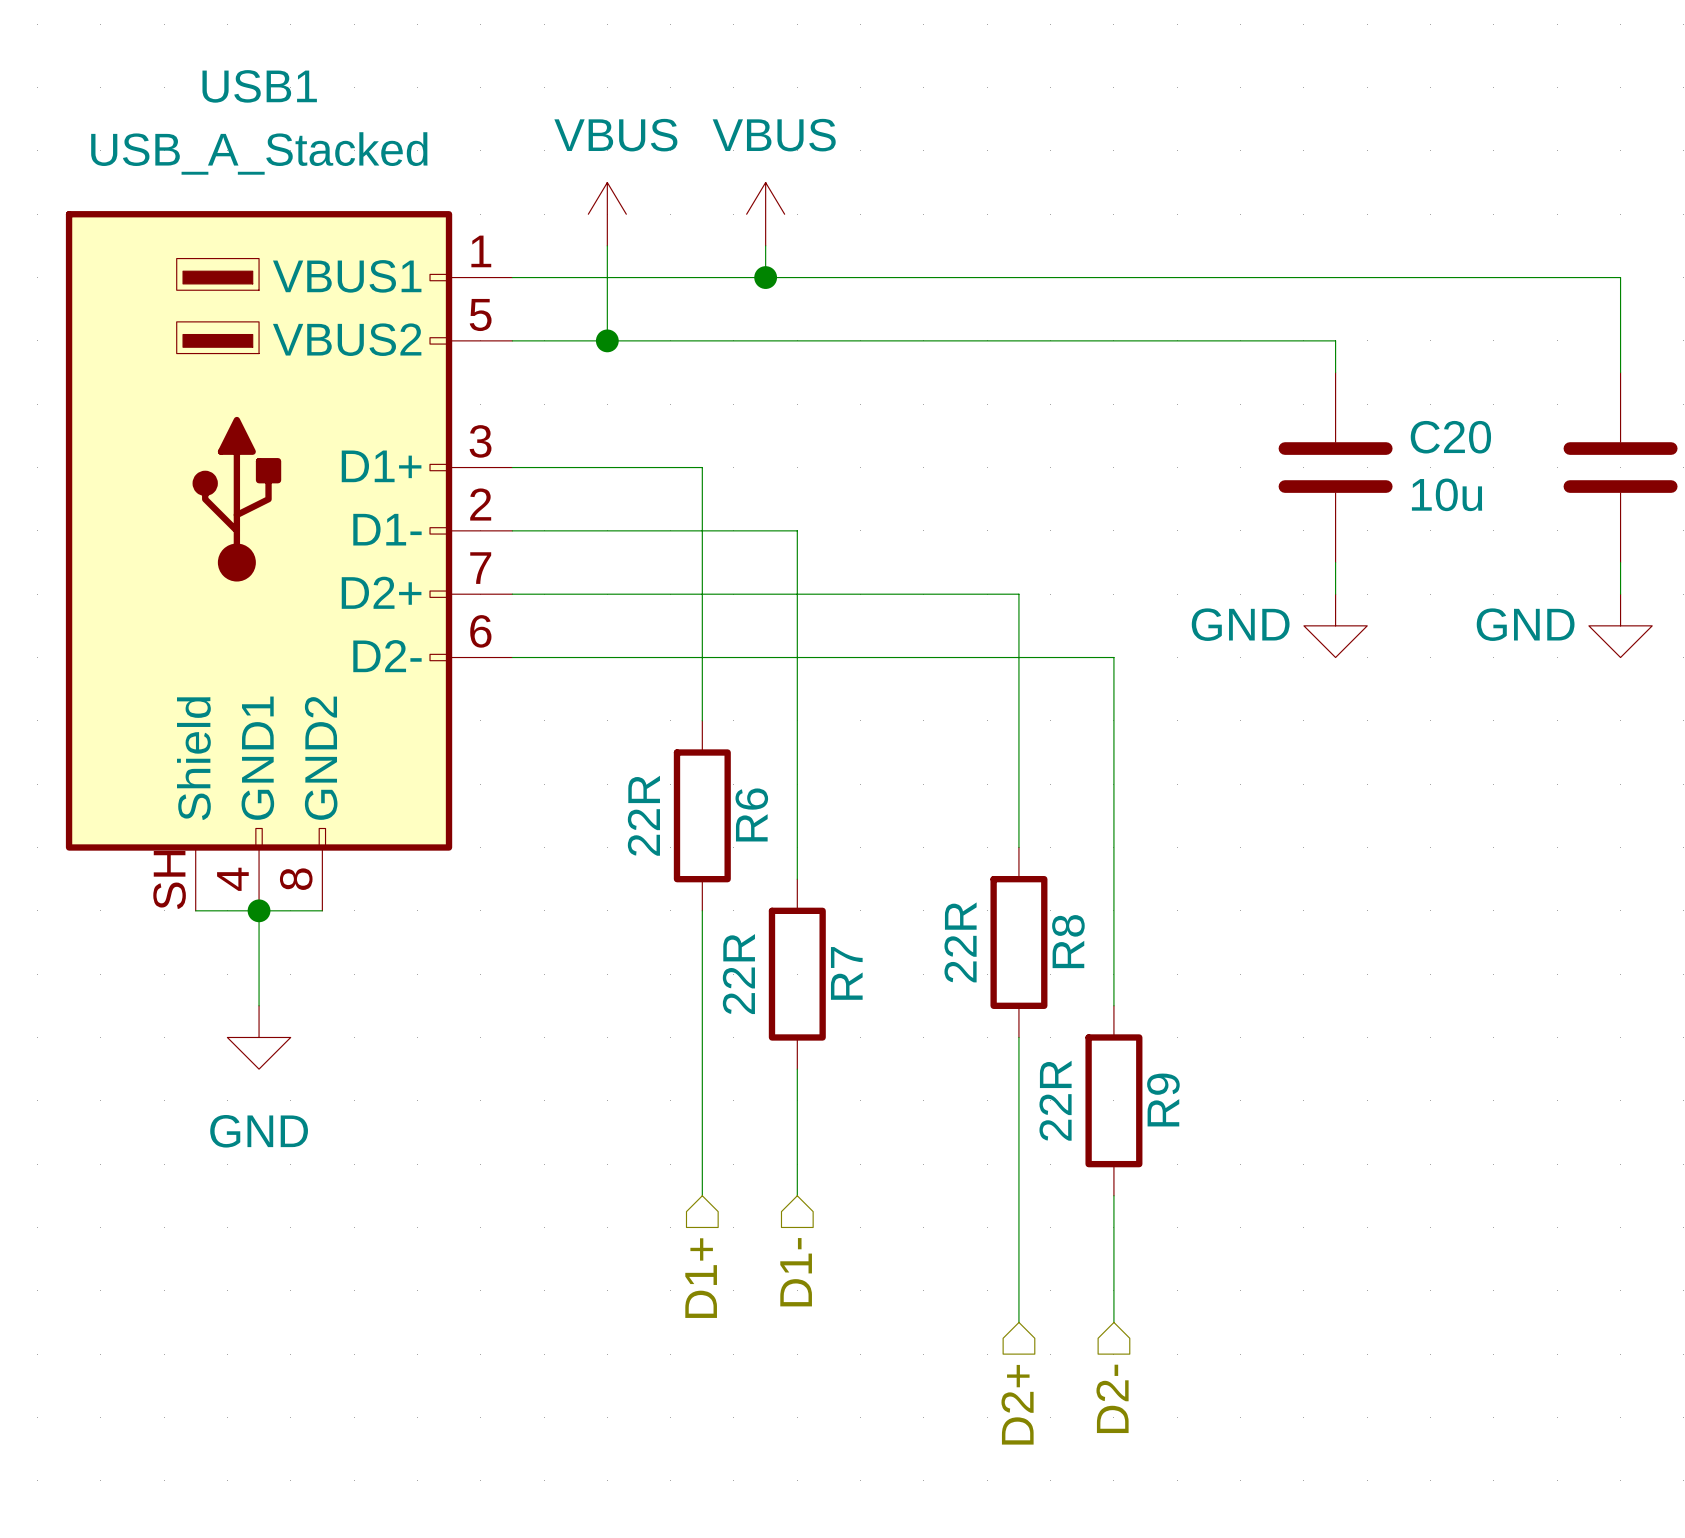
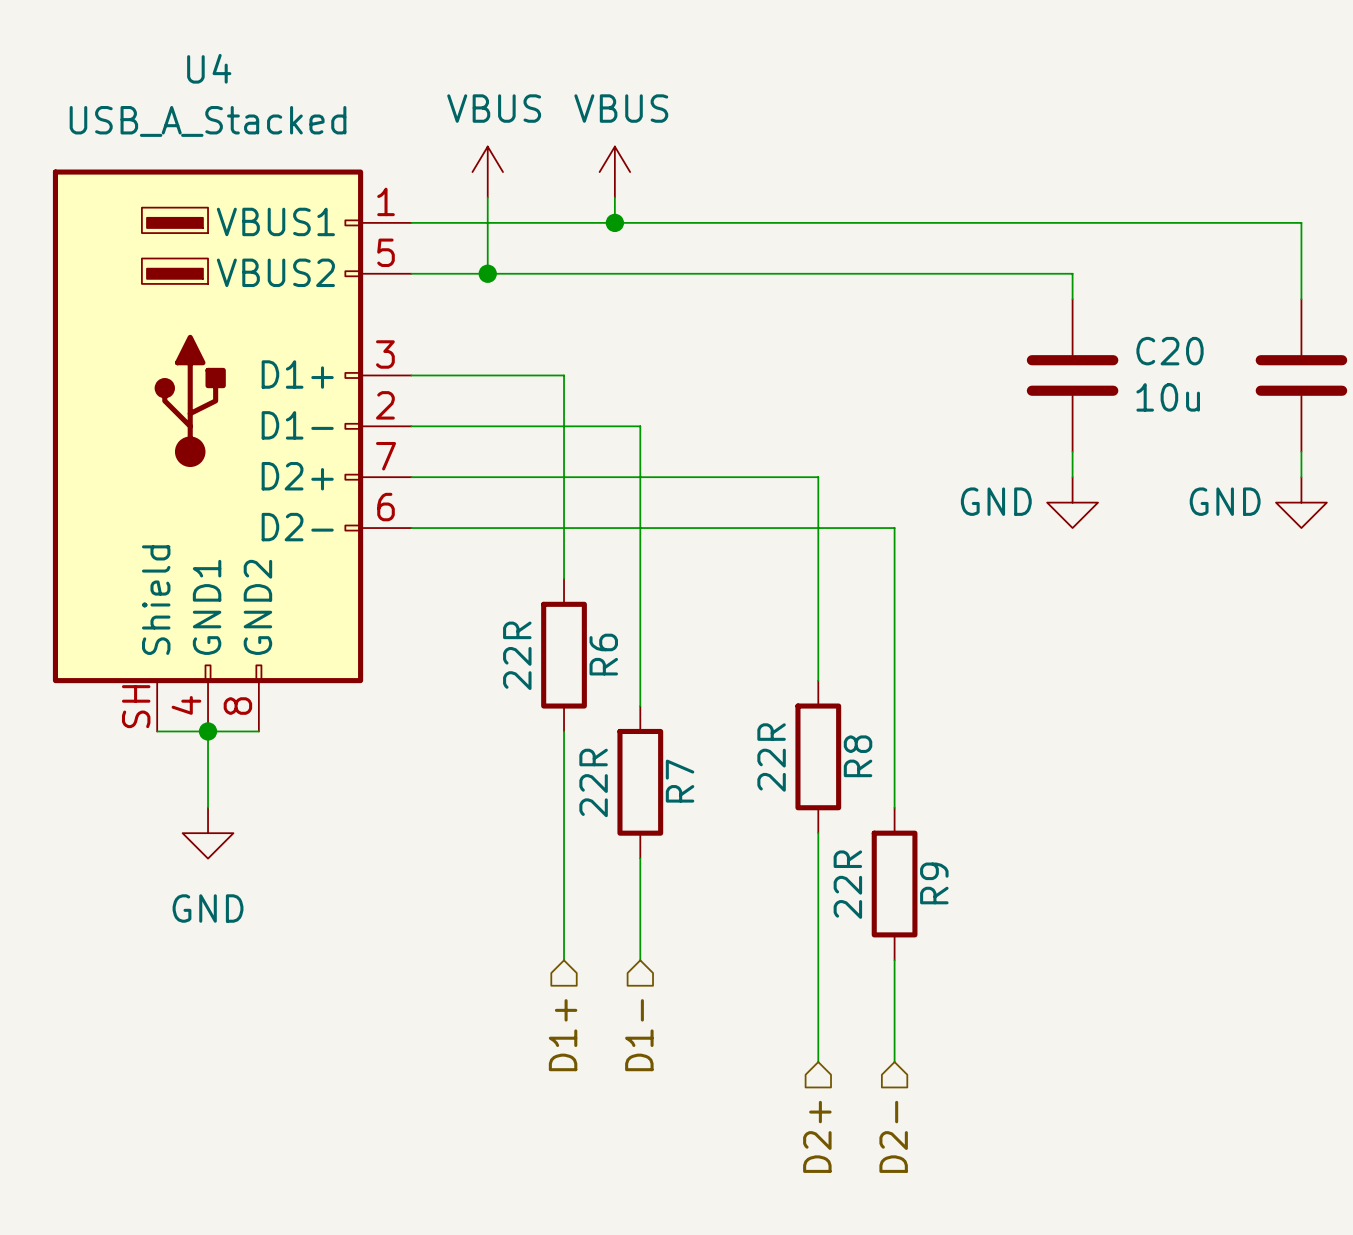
USB1 name: USB1 (259, 86) -> U4 (209, 68)

